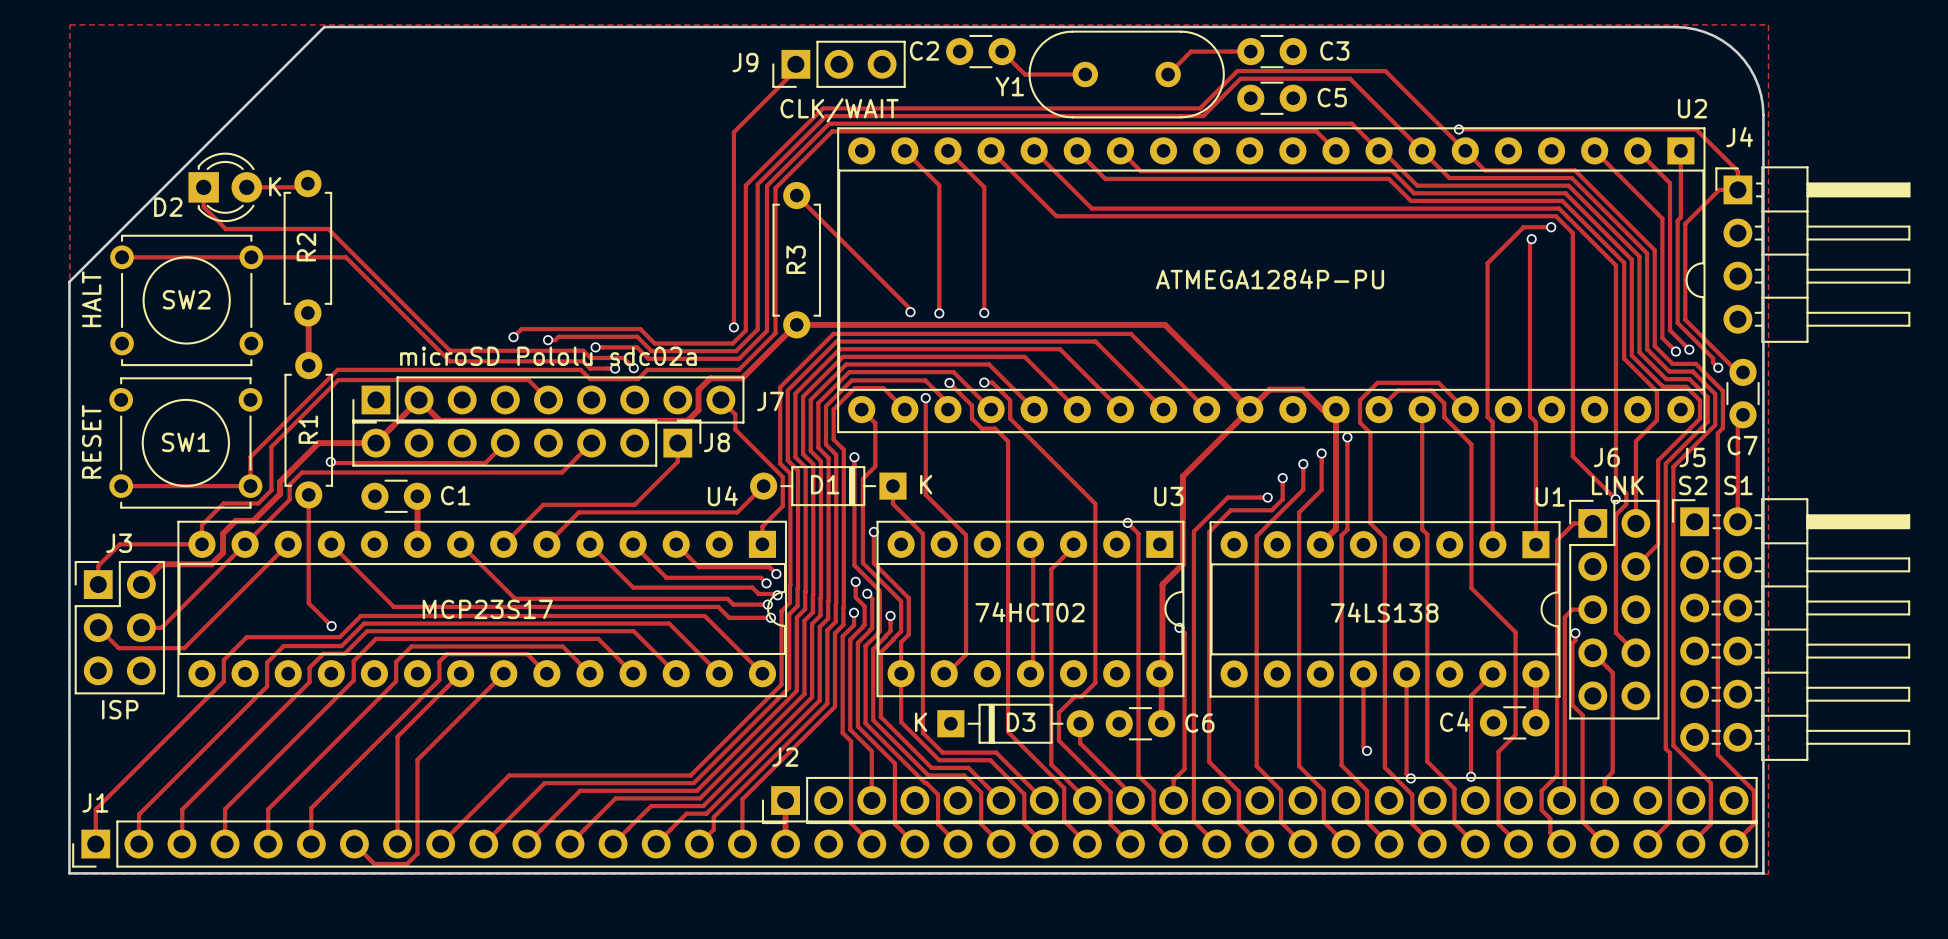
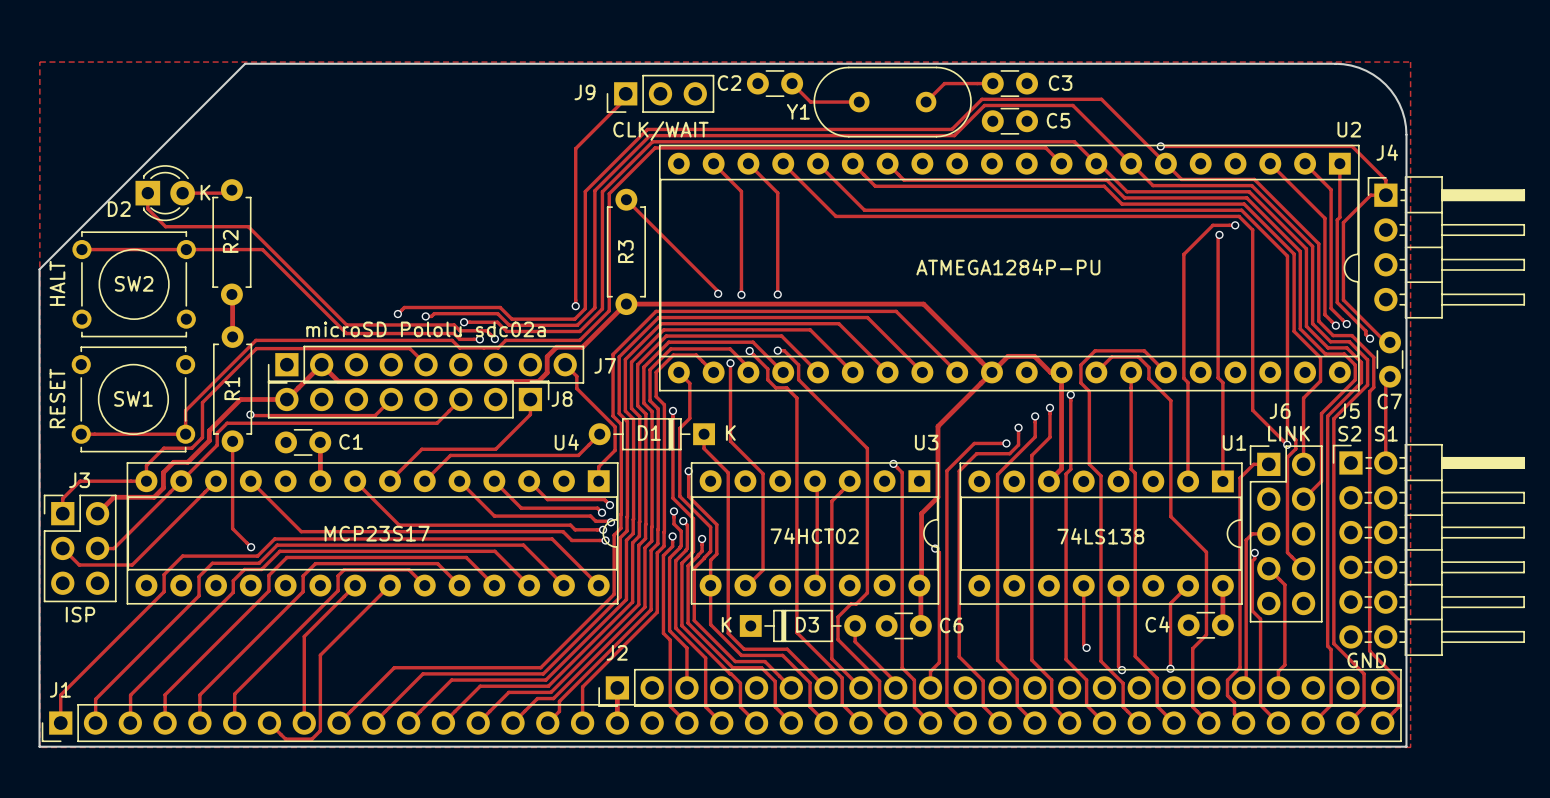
text: none -> GND (1366, 660)

